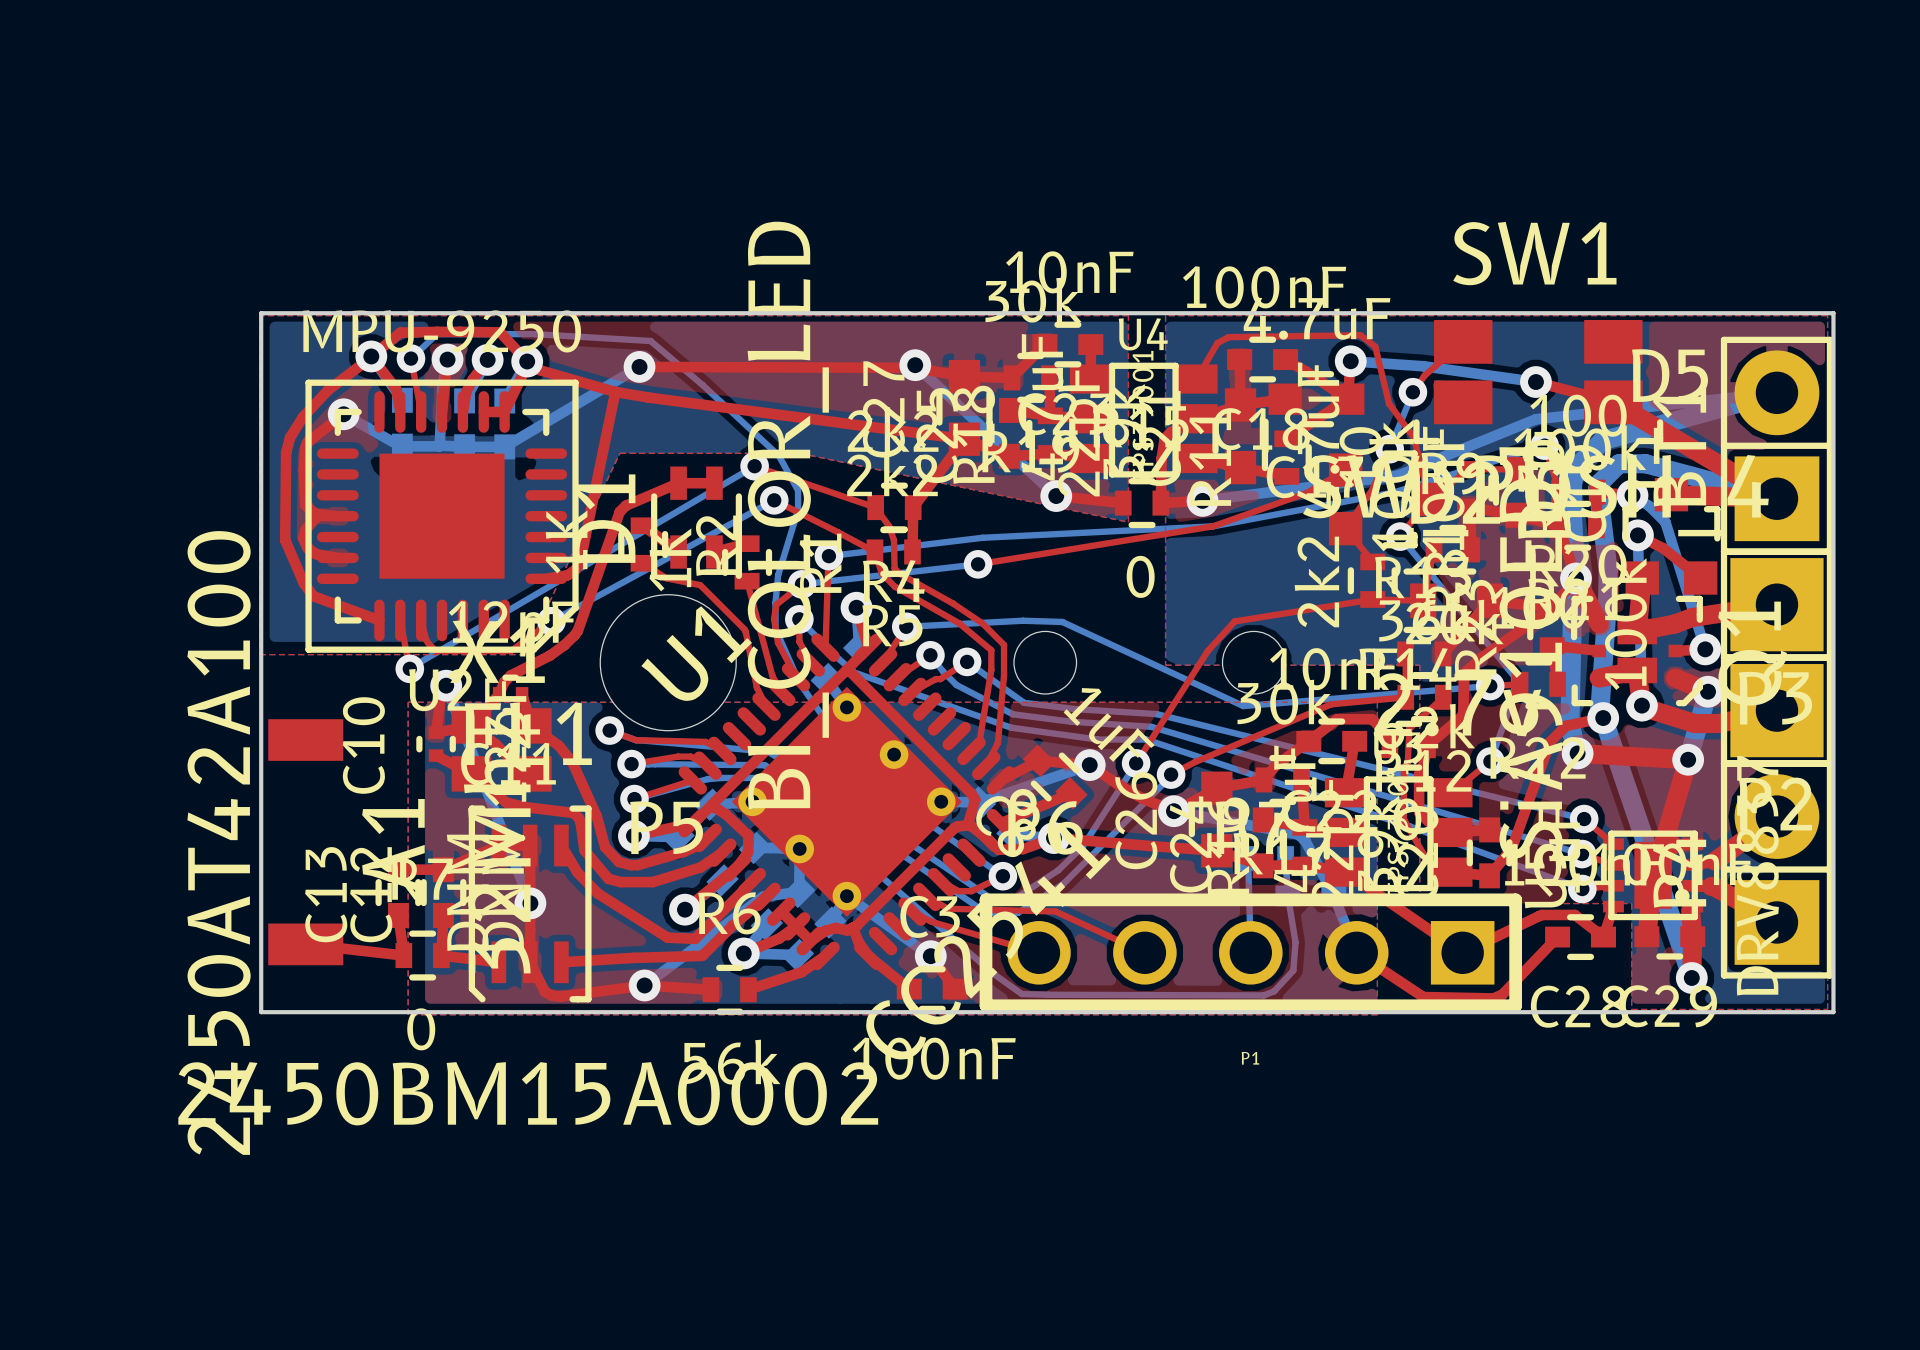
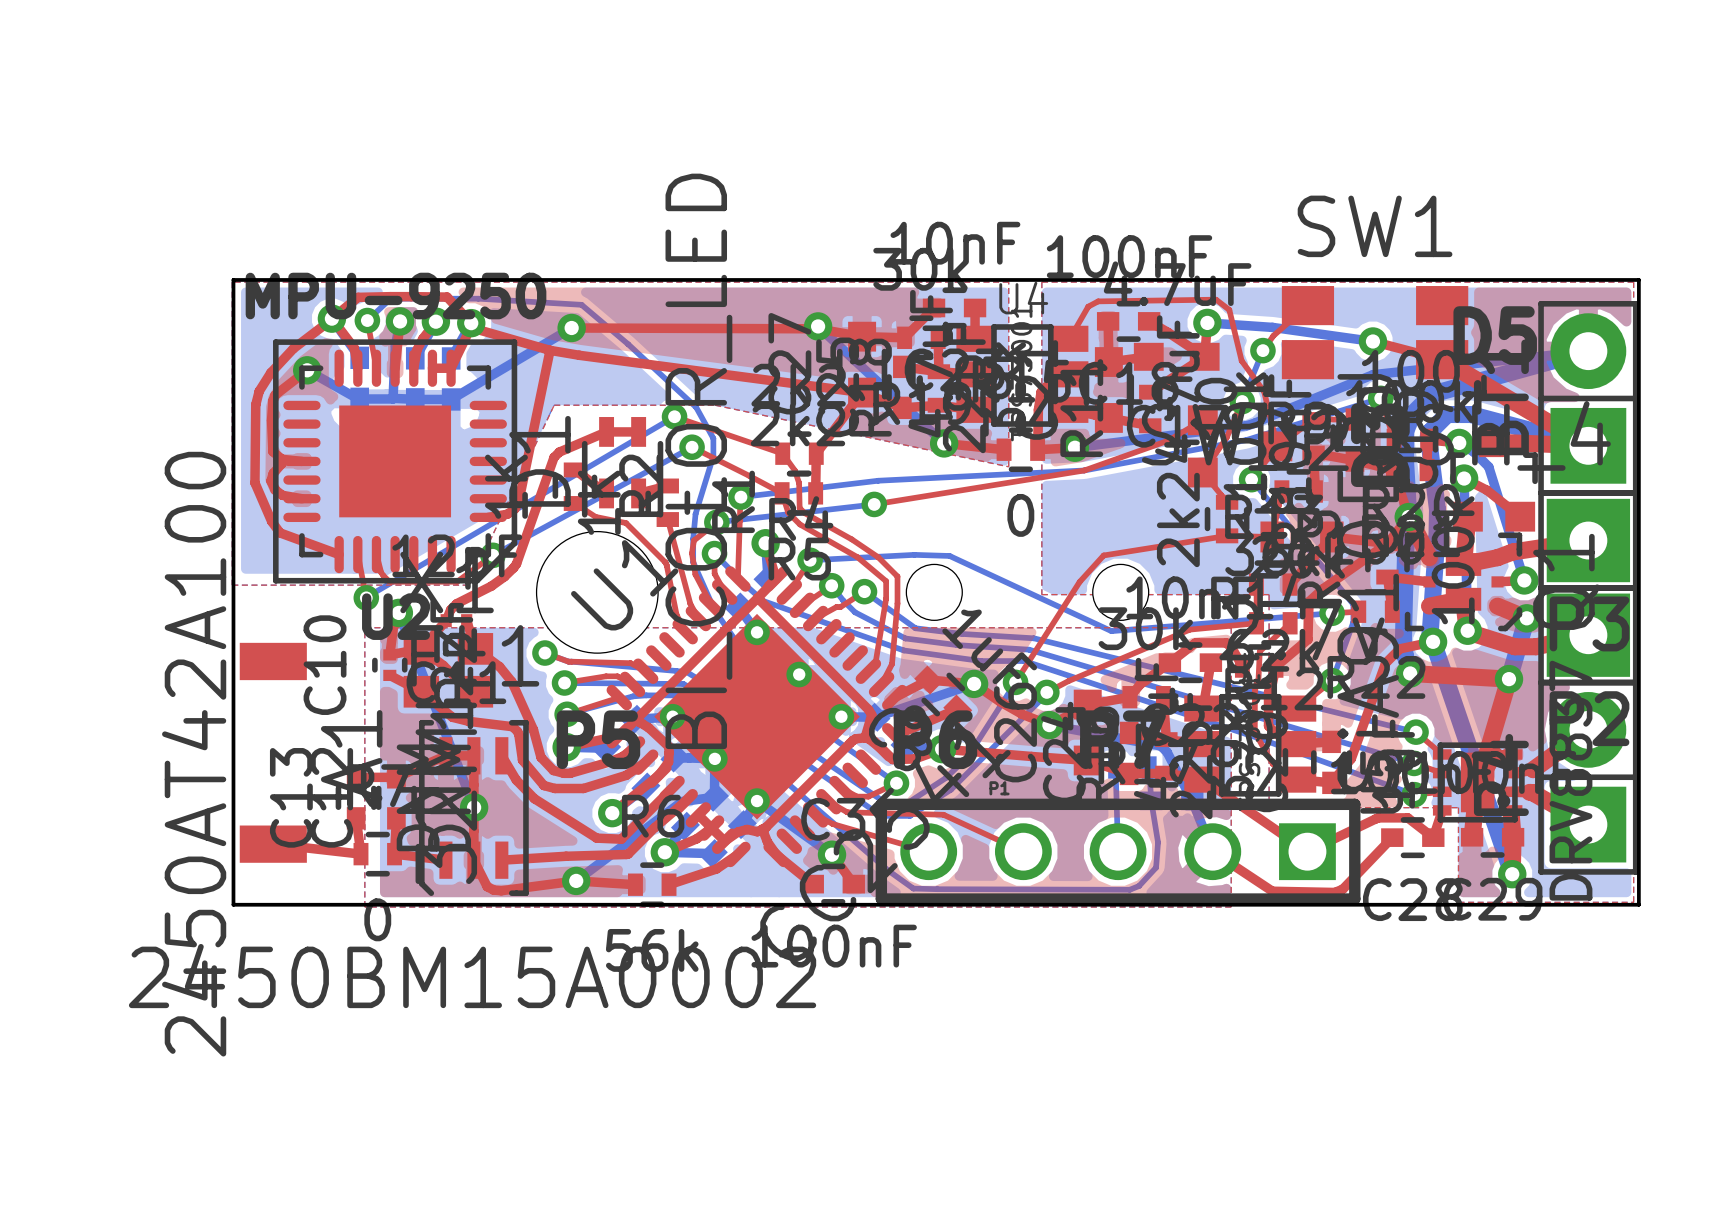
P1 name position: P1 (1250, 1058) -> P1 (999, 788)

